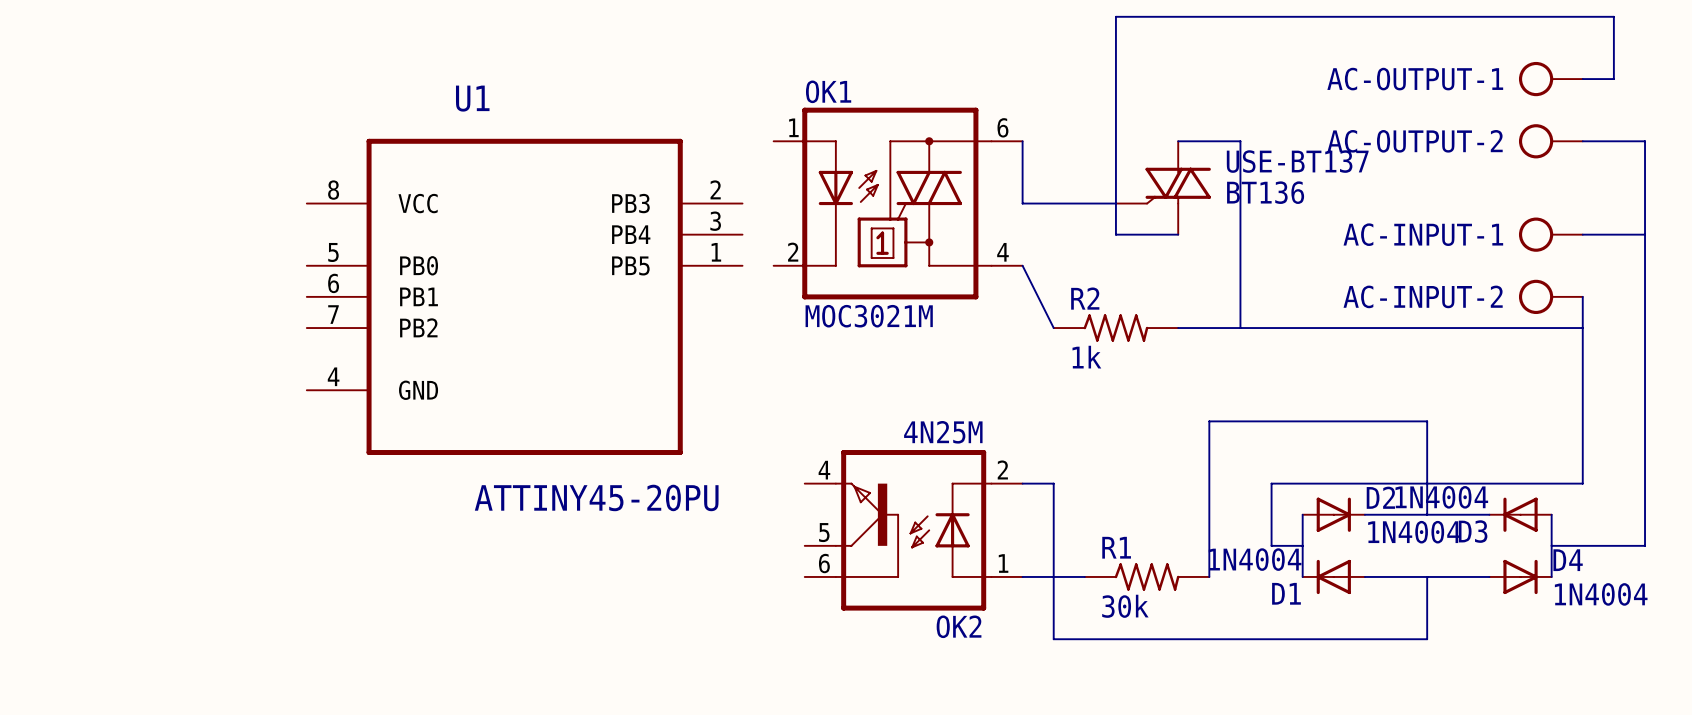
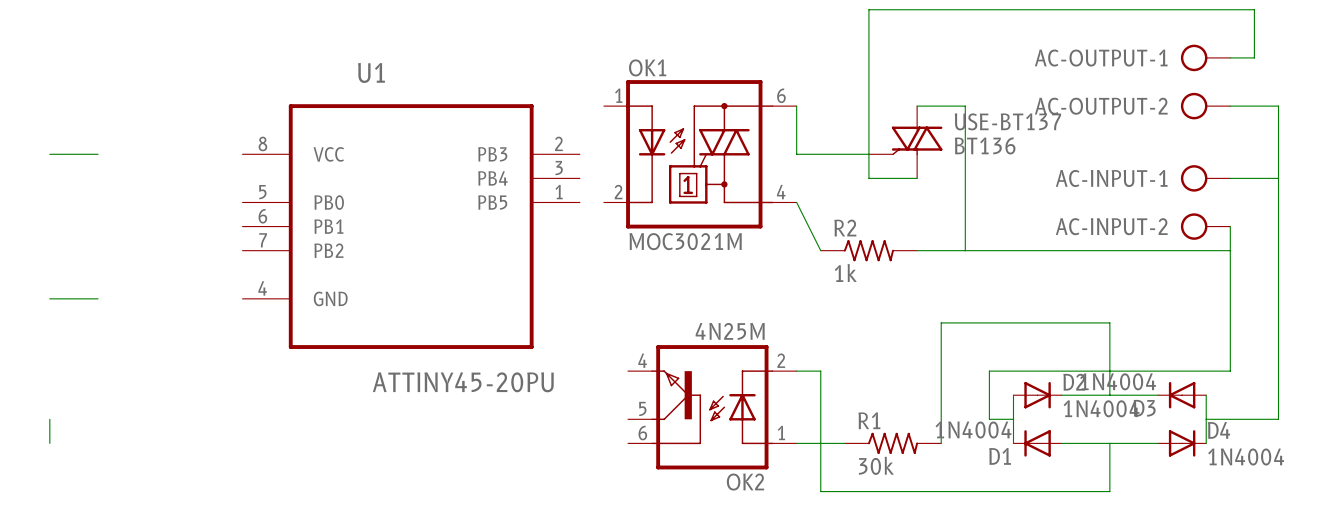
wire: none -> (49, 154) (98, 154)
wire: none -> (49, 298) (98, 298)
wire: none -> (49, 419) (49, 443)

